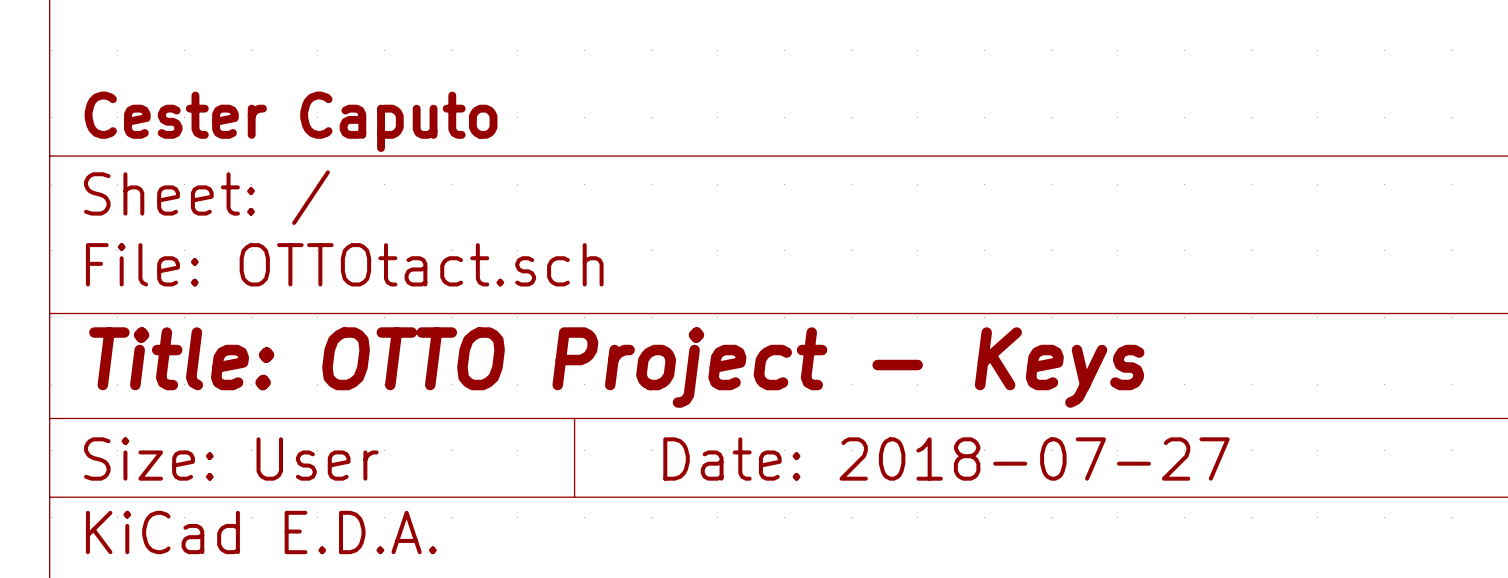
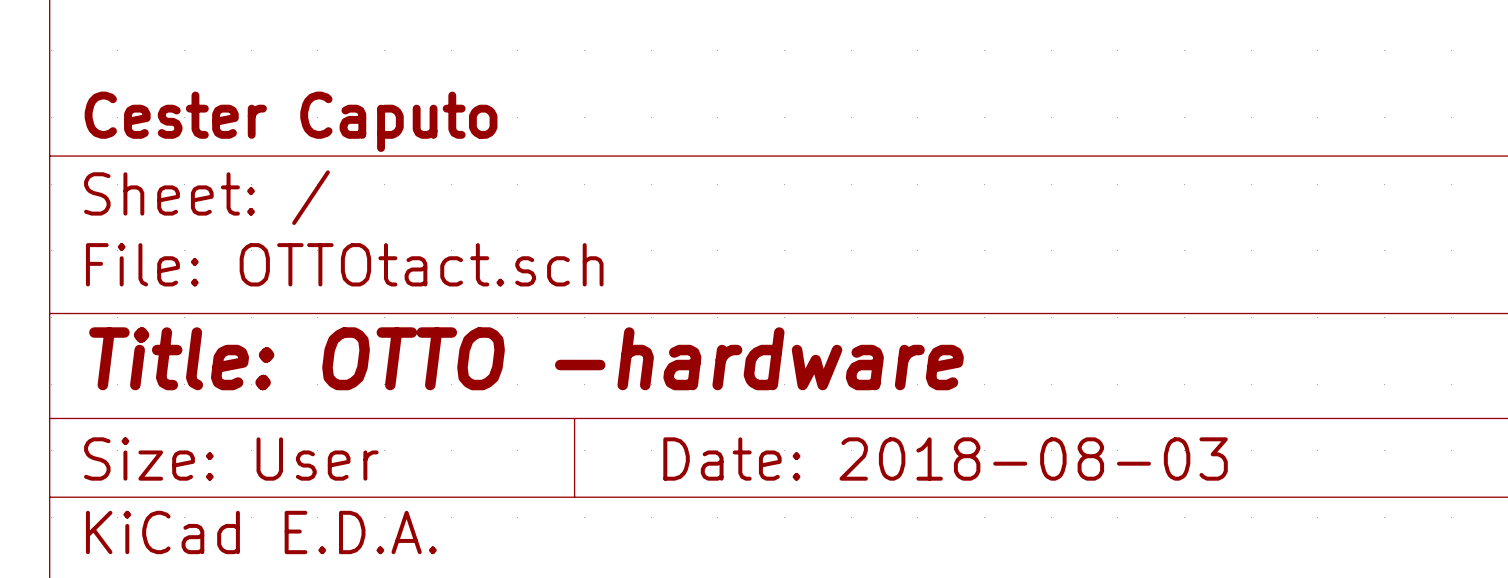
title block: Title: OTTO Project - Keys (616, 367) -> Title: OTTO -hardware (526, 358)
title block: Date: 2018-07-27 (946, 459) -> Date: 2018-08-03 (945, 459)

